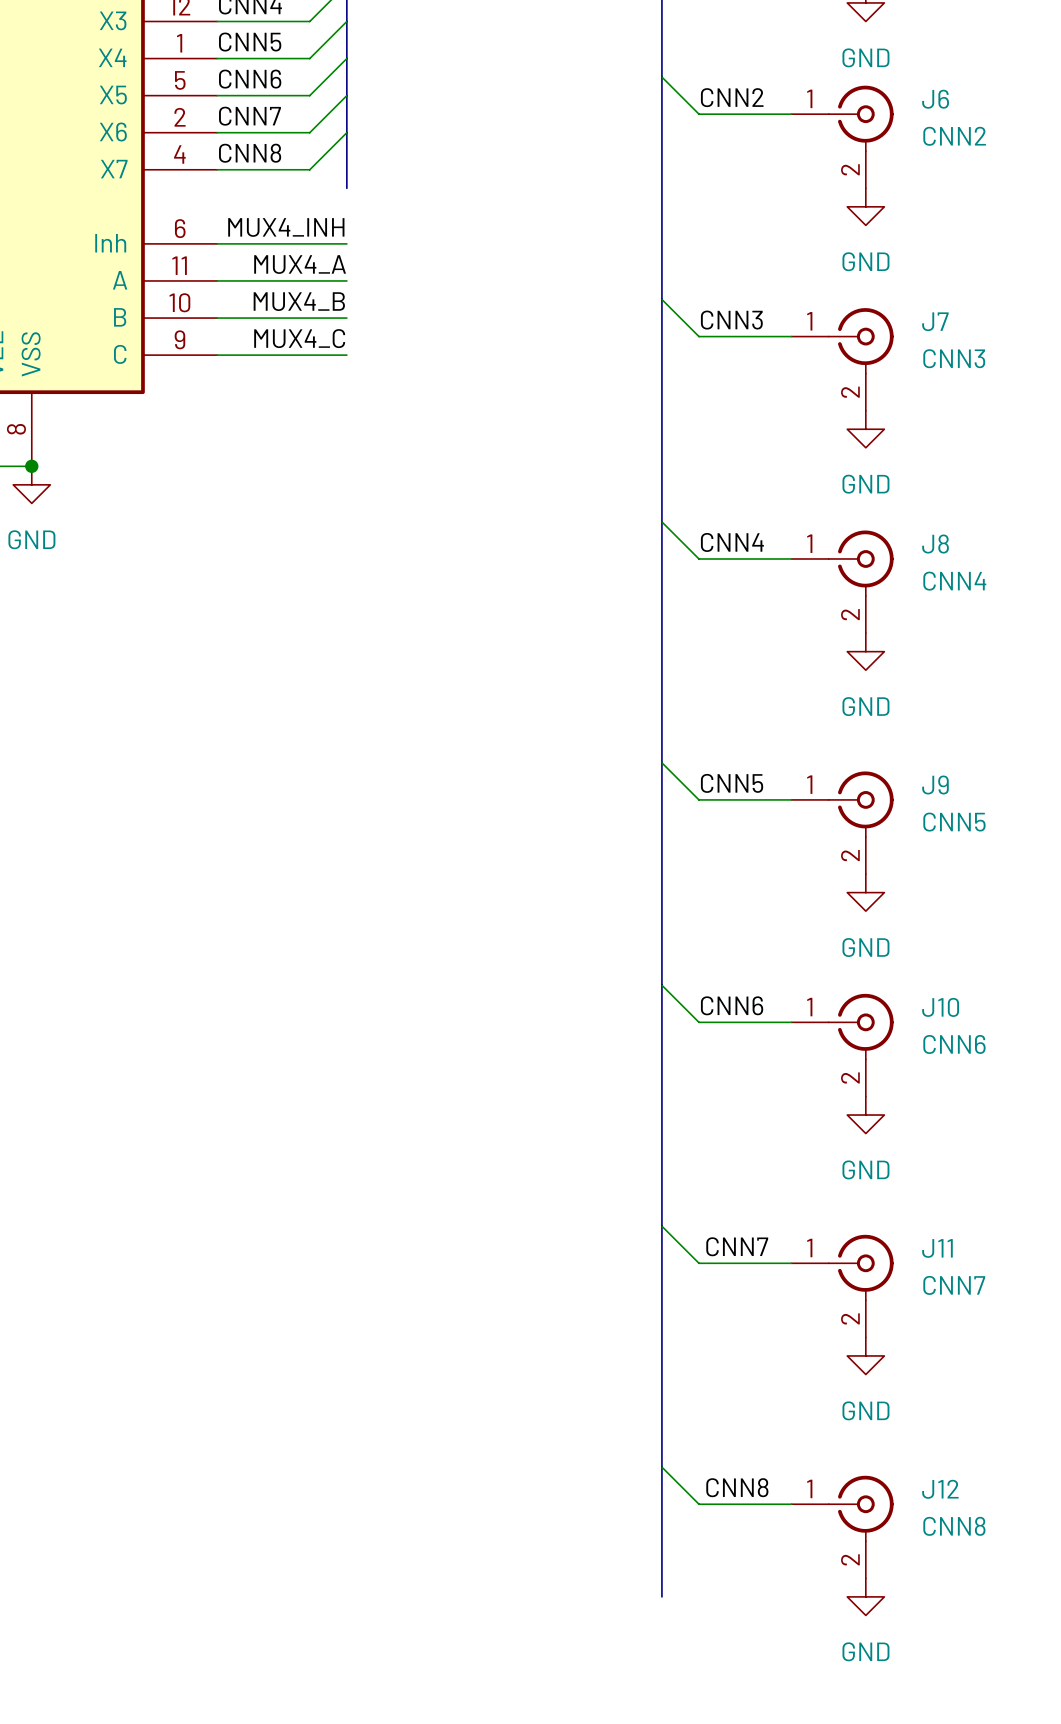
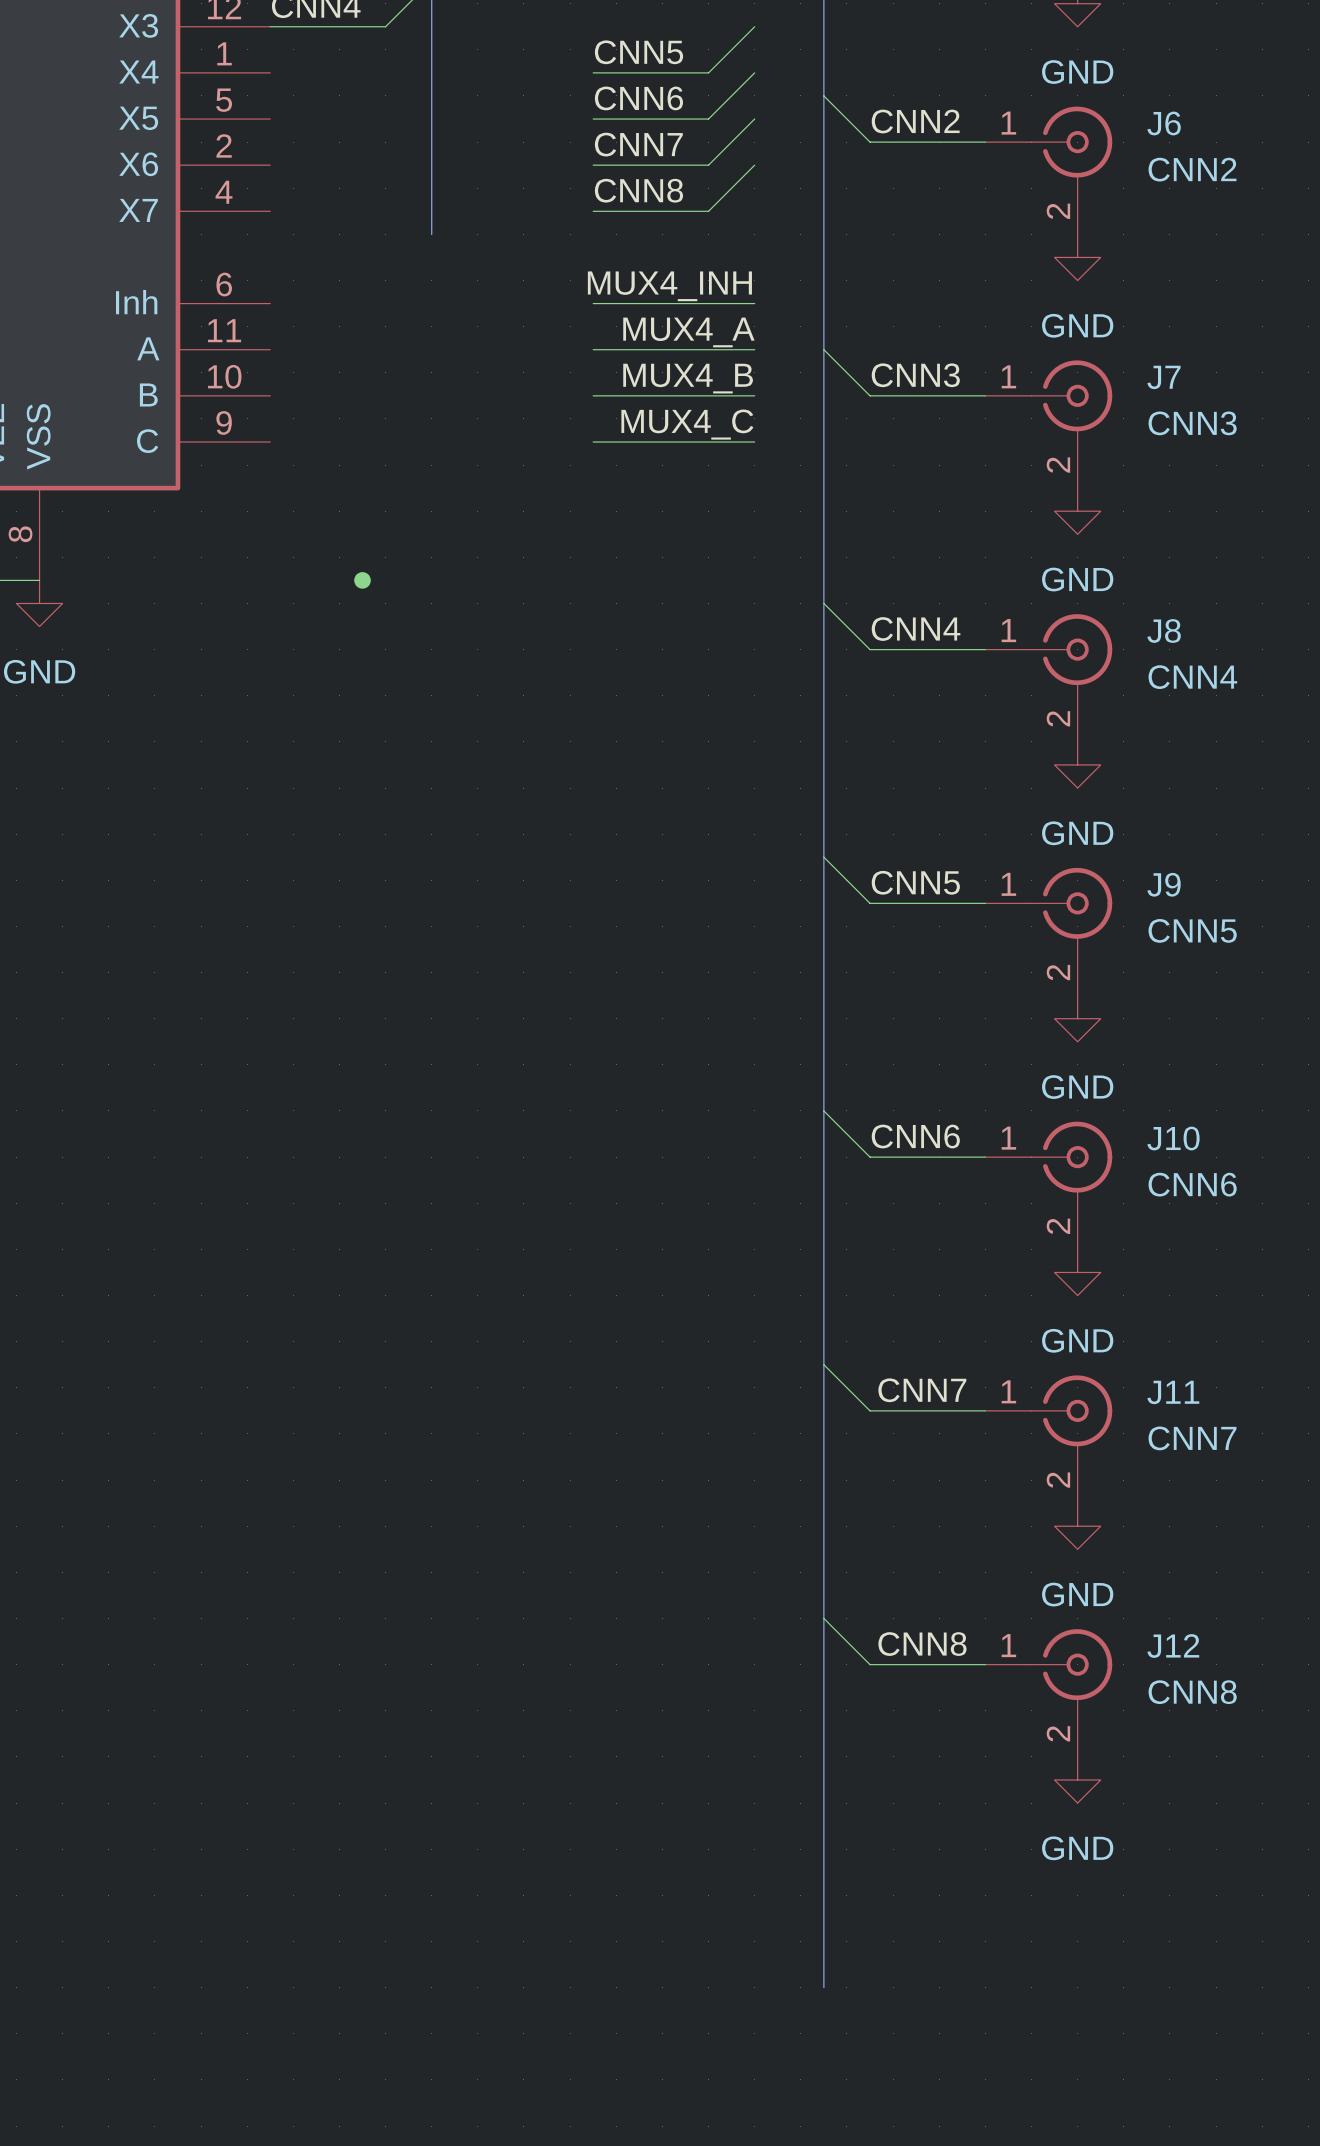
wire: (346, 21) (309, 58) (217, 58) -> (754, 26) (708, 72) (593, 72)
label: CNN5 (250, 42) -> none
label: none -> CNN5 (638, 52)
wire: (346, 58) (309, 95) (217, 95) -> (754, 72) (708, 119) (593, 119)
label: CNN6 (250, 79) -> none
label: none -> CNN6 (638, 98)
wire: (346, 95) (309, 132) (217, 132) -> (754, 119) (708, 165) (593, 165)
label: CNN7 (249, 116) -> none
label: none -> CNN7 (638, 144)
wire: (346, 132) (309, 169) (217, 169) -> (754, 165) (708, 211) (593, 211)
label: CNN8 (250, 153) -> none
label: none -> CNN8 (638, 190)
label position: MUX4_INH (286, 227) -> MUX4_INH (669, 286)
wire: (217, 243) (346, 243) -> (593, 303) (754, 303)
label position: MUX4_A (300, 264) -> MUX4_A (688, 332)
wire: (217, 280) (346, 280) -> (593, 349) (754, 349)
wire: (661, 299) (699, 336) (791, 336) -> (823, 349) (870, 395) (985, 395)
label position: MUX4_B (299, 301) -> MUX4_B (688, 378)
wire: (217, 318) (346, 318) -> (593, 395) (754, 395)
label position: CNN3 (731, 320) -> CNN3 (915, 375)
label position: MUX4_C (299, 338) -> MUX4_C (687, 424)
wire: (217, 355) (346, 355) -> (593, 441) (754, 441)
J7 position: (842, 359) -> (1048, 424)
power symbol position: GND (865, 429) -> GND (1077, 511)
junction: (31, 466) -> none
junction: none -> (362, 580)
wire: (661, 521) (699, 558) (791, 558) -> (823, 603) (870, 649) (985, 649)
label position: CNN4 (732, 542) -> CNN4 (916, 629)
J8 position: (842, 581) -> (1048, 678)
power symbol position: GND (865, 651) -> GND (1077, 764)
wire: (661, 762) (699, 799) (791, 799) -> (823, 857) (870, 903) (985, 903)
label position: CNN5 (732, 783) -> CNN5 (915, 882)
power symbol: none -> GND (1077, 1018)
J9 position: (842, 822) -> (1048, 931)
power symbol: GND (865, 892) -> none
wire: (661, 985) (699, 1022) (791, 1022) -> (823, 1110) (870, 1157) (985, 1157)
label position: CNN6 (732, 1005) -> CNN6 (915, 1136)
power symbol: none -> GND (1077, 1272)
J10 position: (842, 1045) -> (1048, 1185)
wire: none -> (823, 1364) (870, 1410) (985, 1410)
power symbol: GND (865, 1115) -> none
wire: (661, 1226) (699, 1263) (791, 1263) -> (823, 1618) (870, 1664) (985, 1664)
power symbol: none -> GND (1077, 1526)
label position: CNN7 (737, 1246) -> CNN7 (922, 1390)
J11 position: (842, 1286) -> (1048, 1439)
power symbol: GND (865, 1355) -> none
power symbol: none -> GND (1077, 1779)
wire: (661, 1467) (699, 1504) (791, 1504) -> none
label position: CNN8 (737, 1487) -> CNN8 (922, 1644)
J12 position: (842, 1527) -> (1048, 1693)
power symbol: GND (865, 1596) -> none

